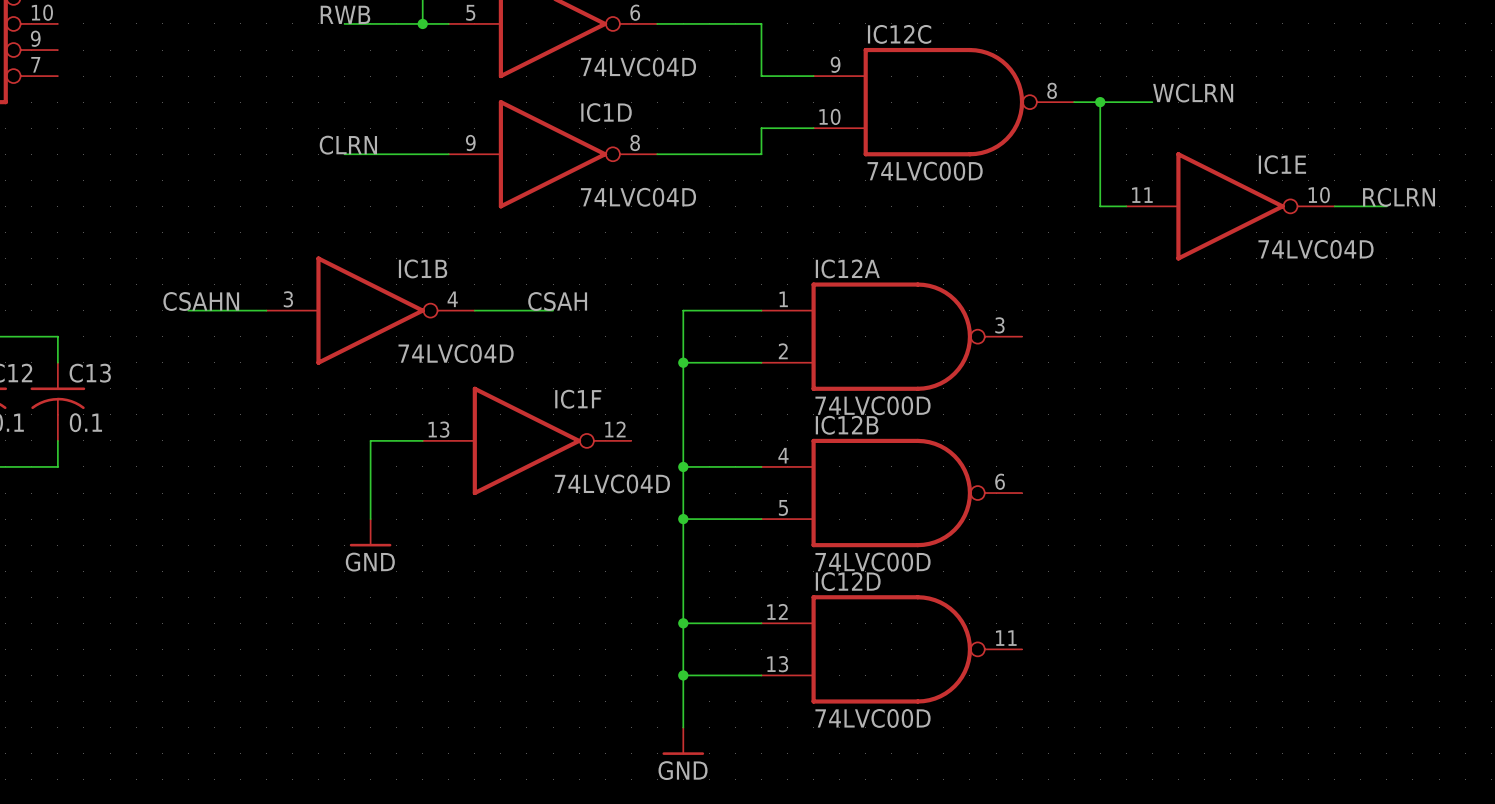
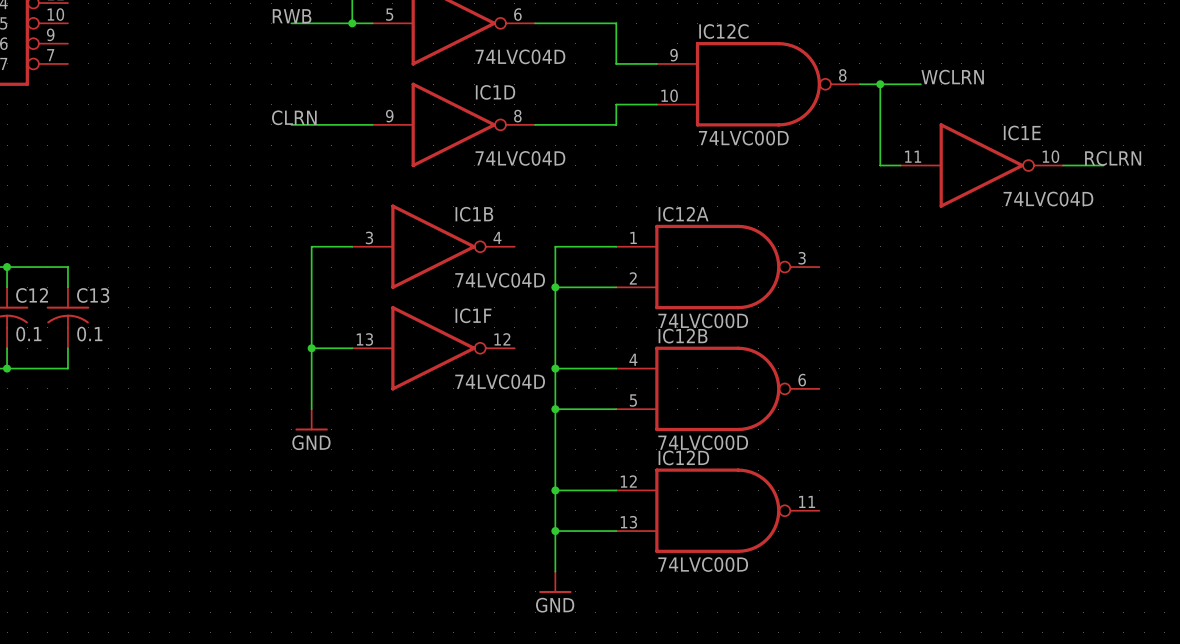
label: CSAHN (201, 301) -> none
label: CSAH (557, 301) -> none
wire: (188, 310) (266, 310) -> none
IC1B position: (370, 310) -> (433, 246)
wire: none -> (352, 246) (311, 246) (311, 348)
wire: (474, 310) (553, 310) -> none
junction: none -> (311, 348)

